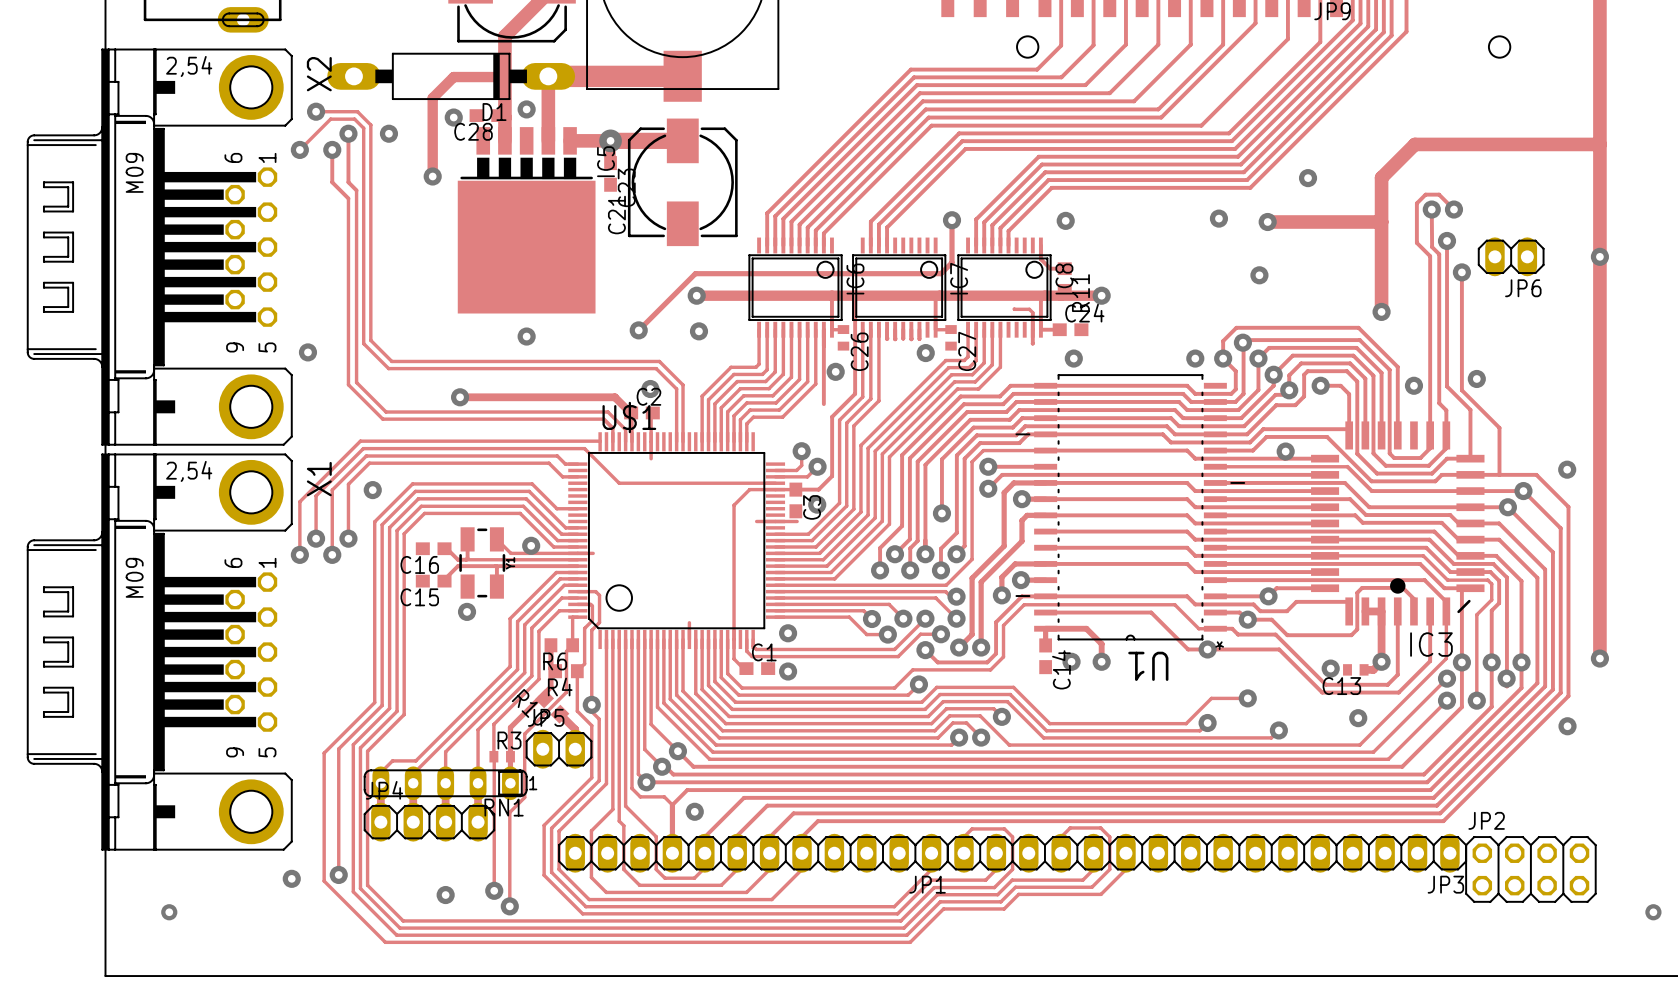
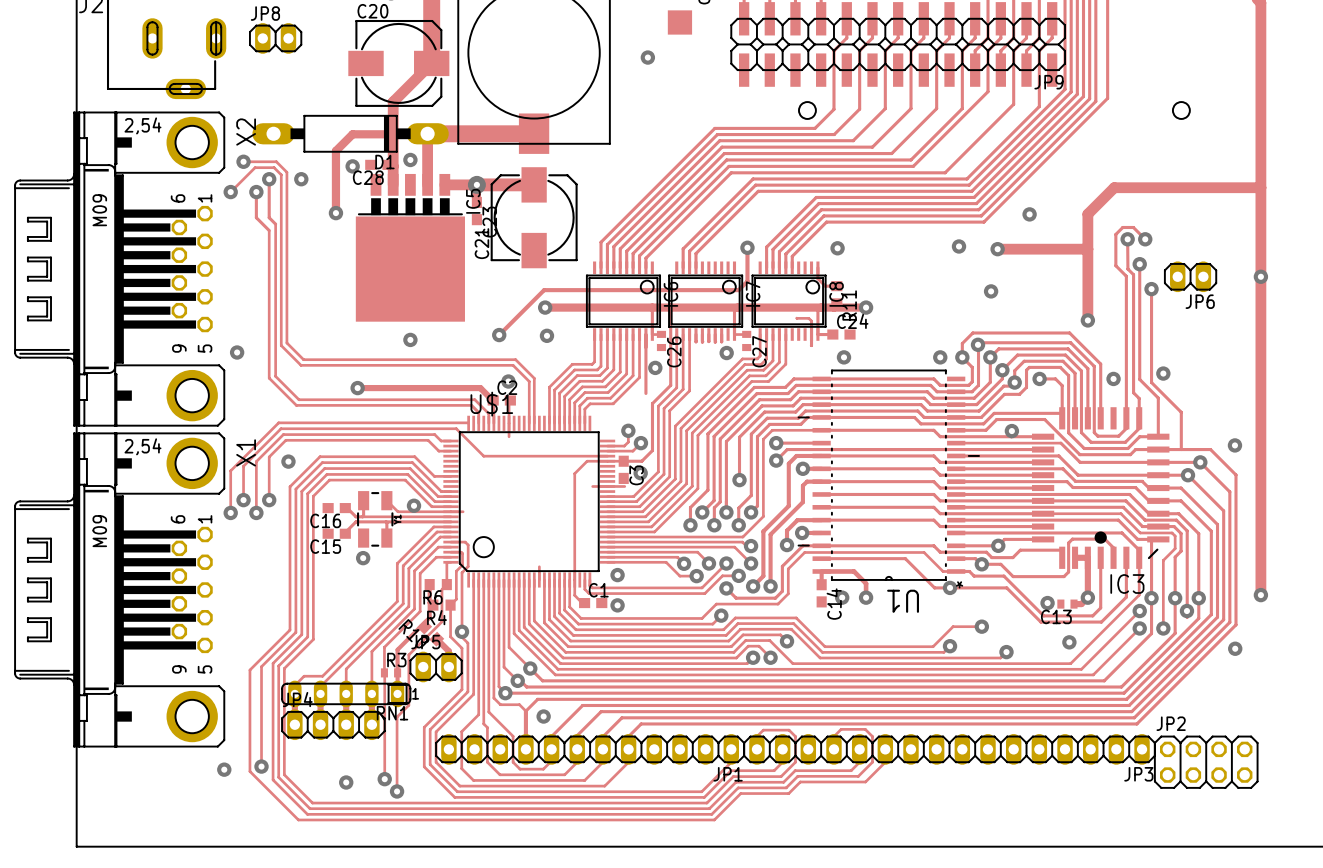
via: (169, 912) -> none
via: (1653, 912) -> none

